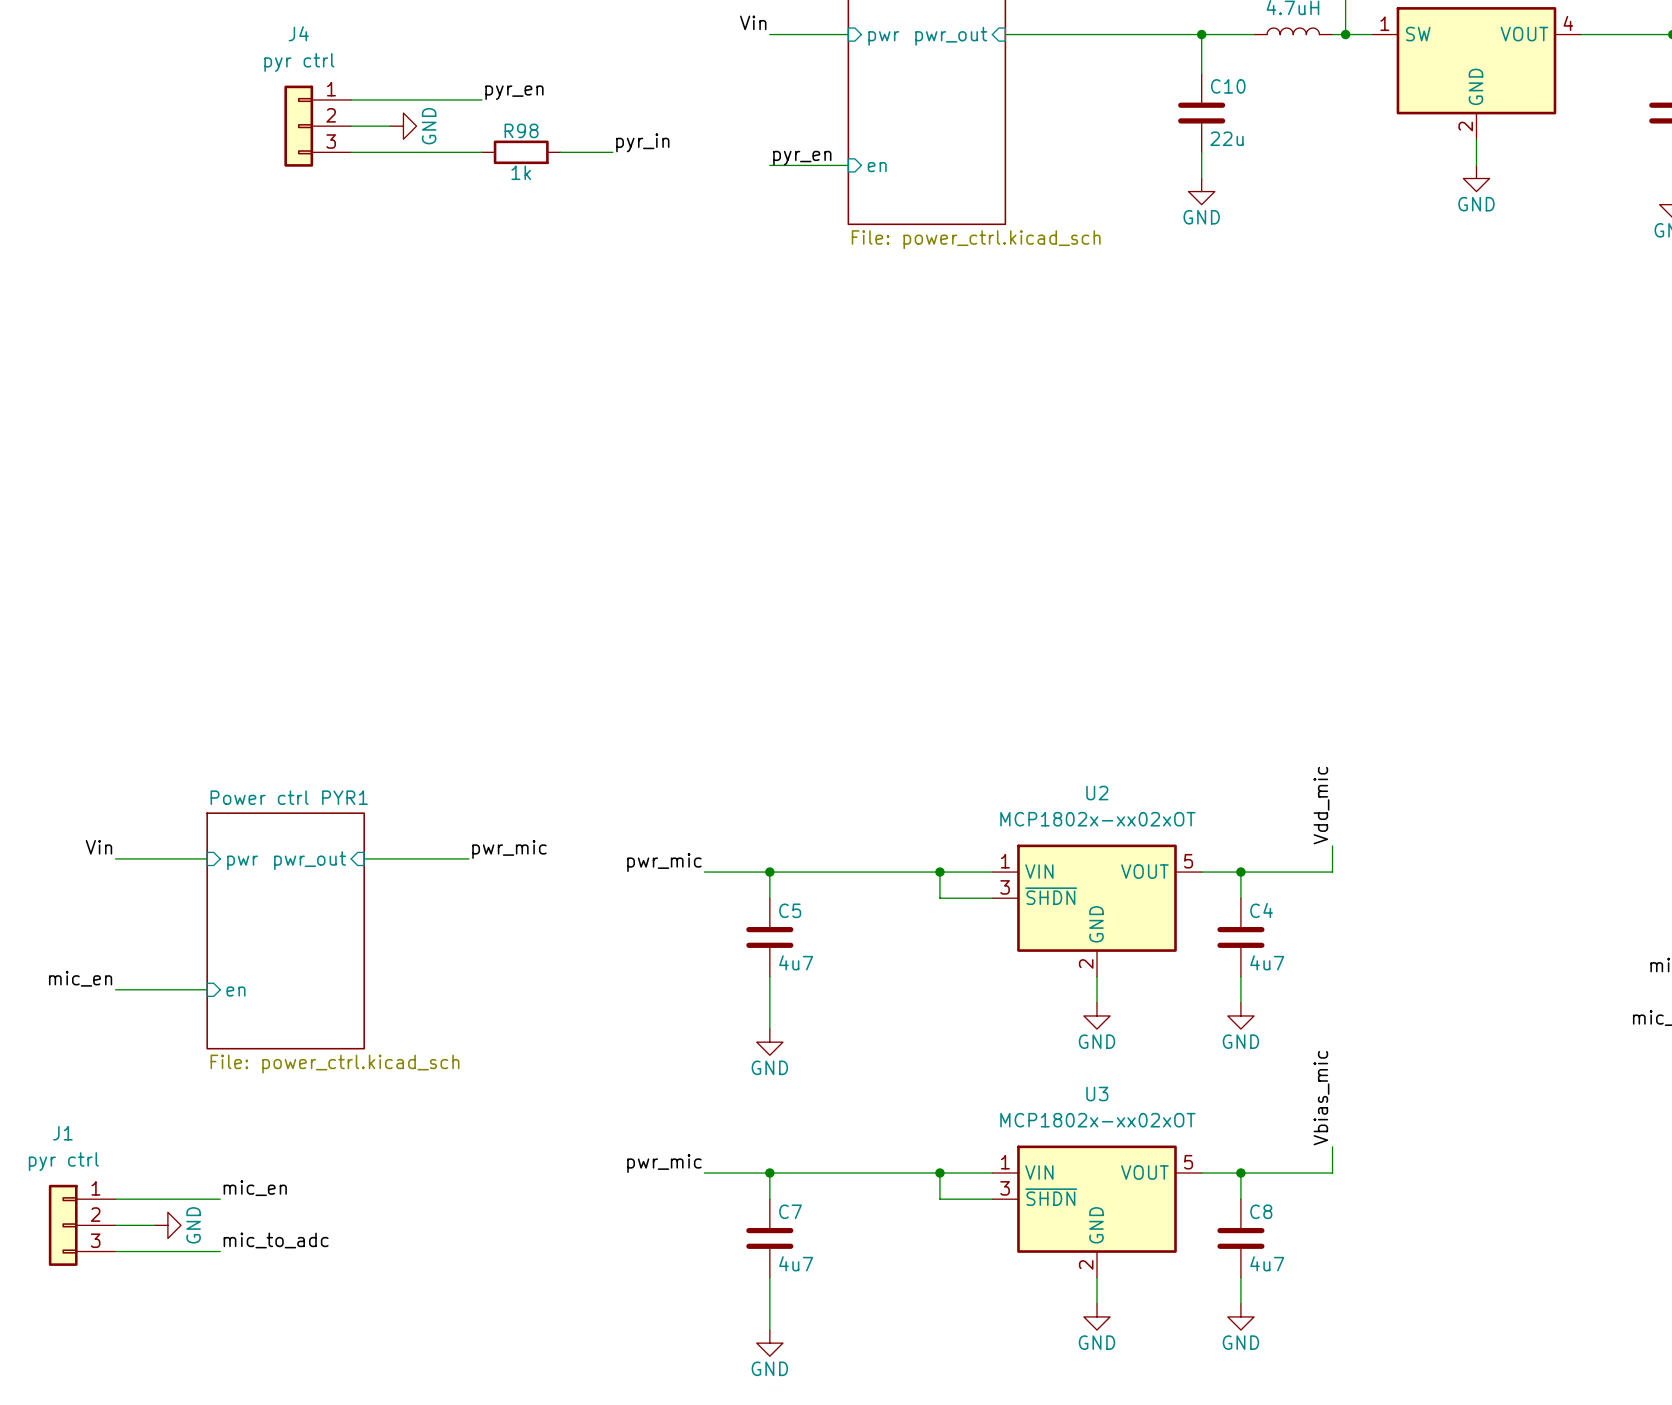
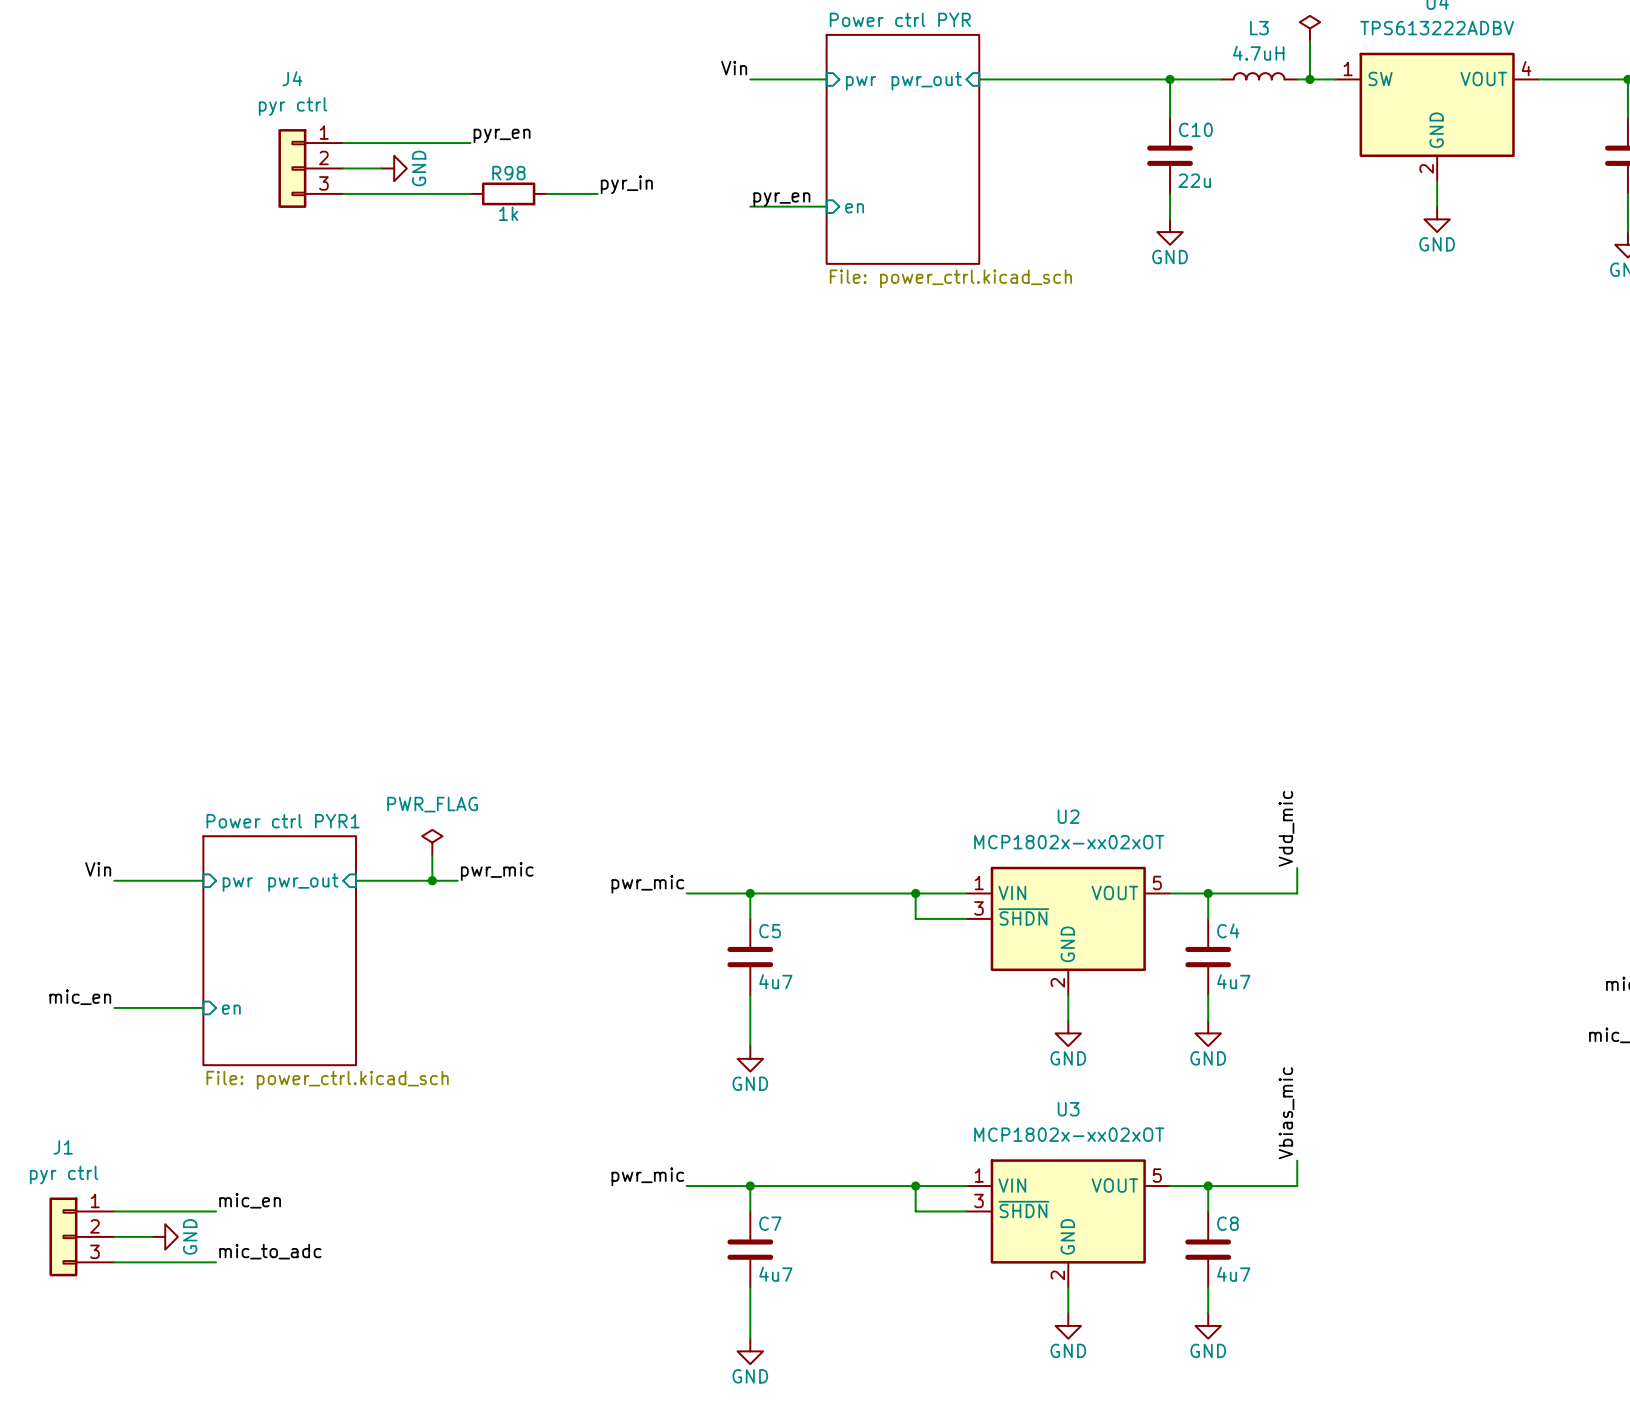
power symbol: none -> PWR_FLAG (432, 842)
wire: none -> (432, 855) (432, 880)
junction: none -> (432, 880)

